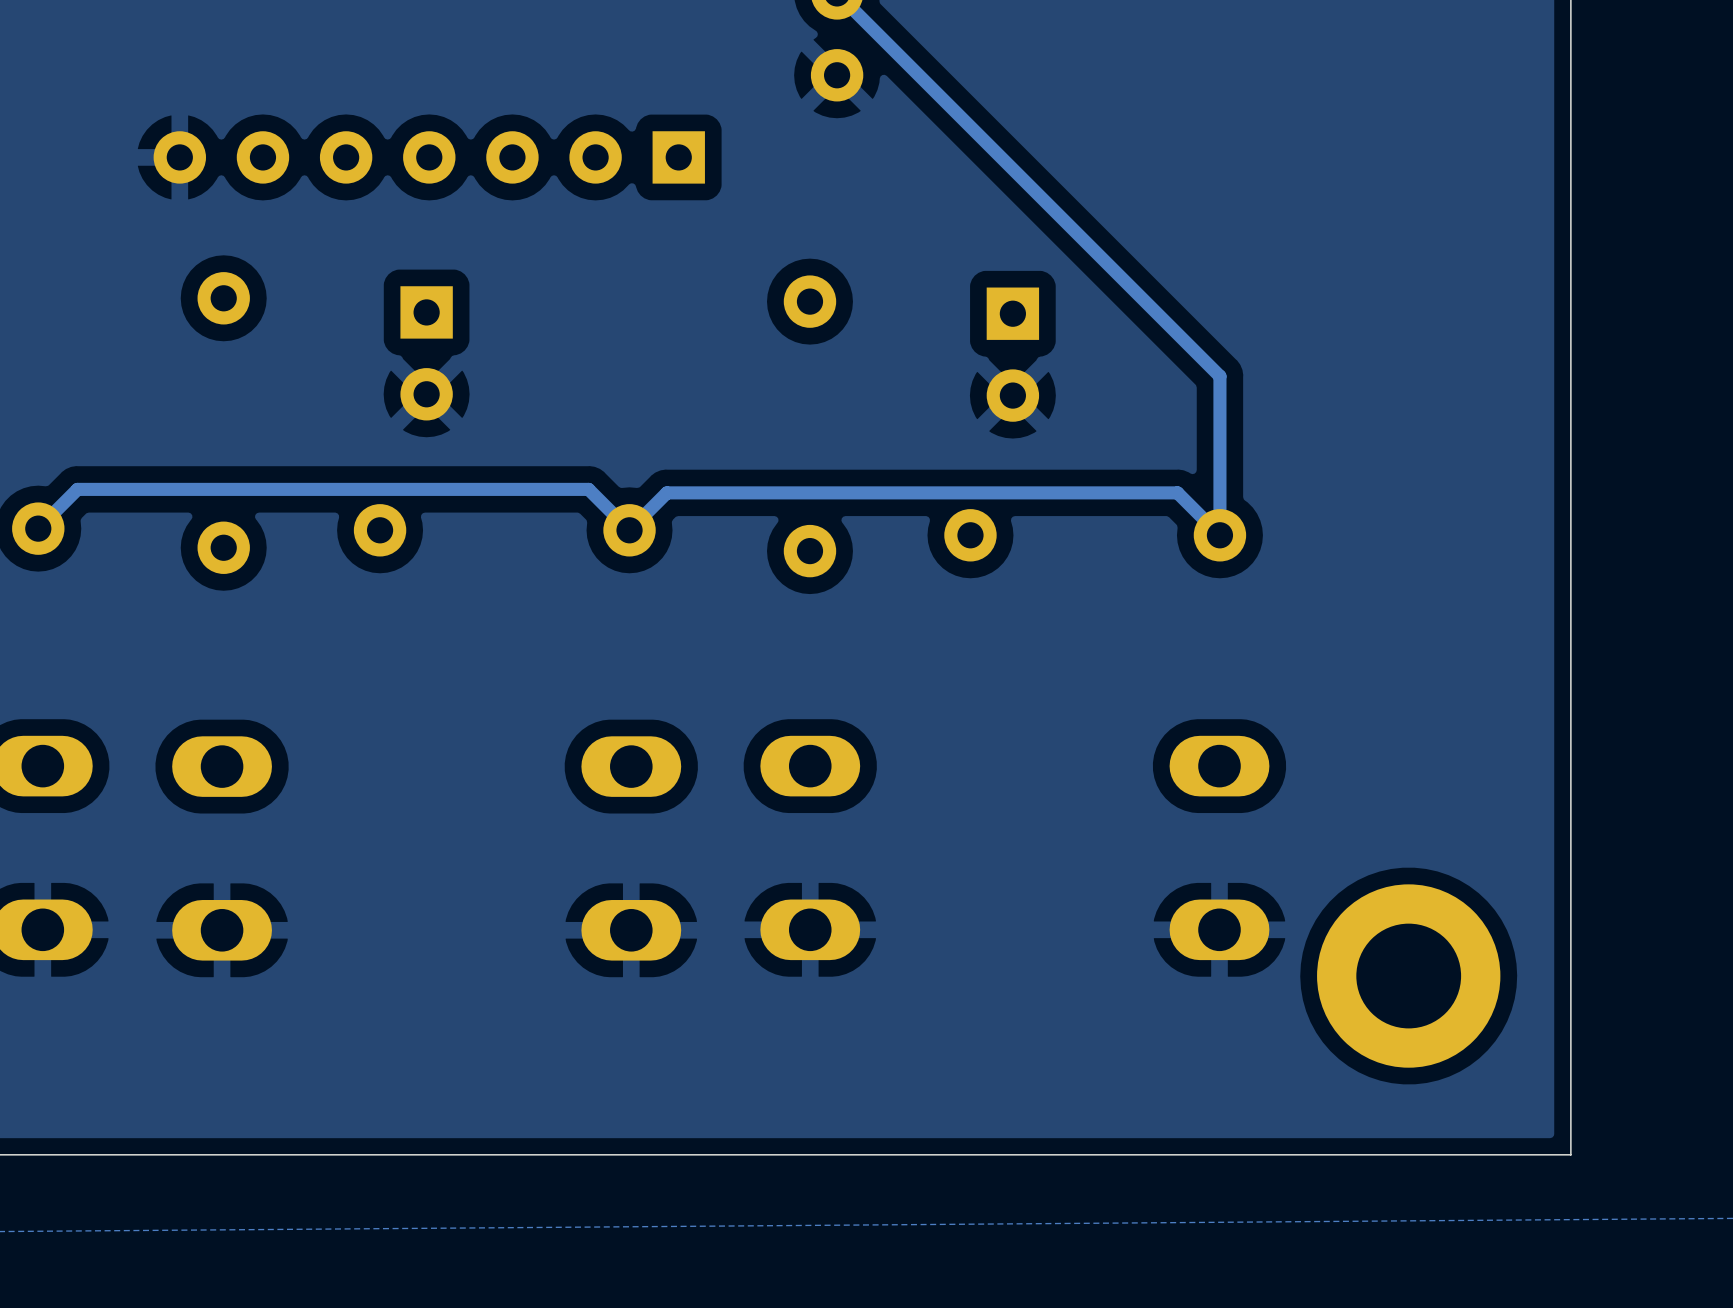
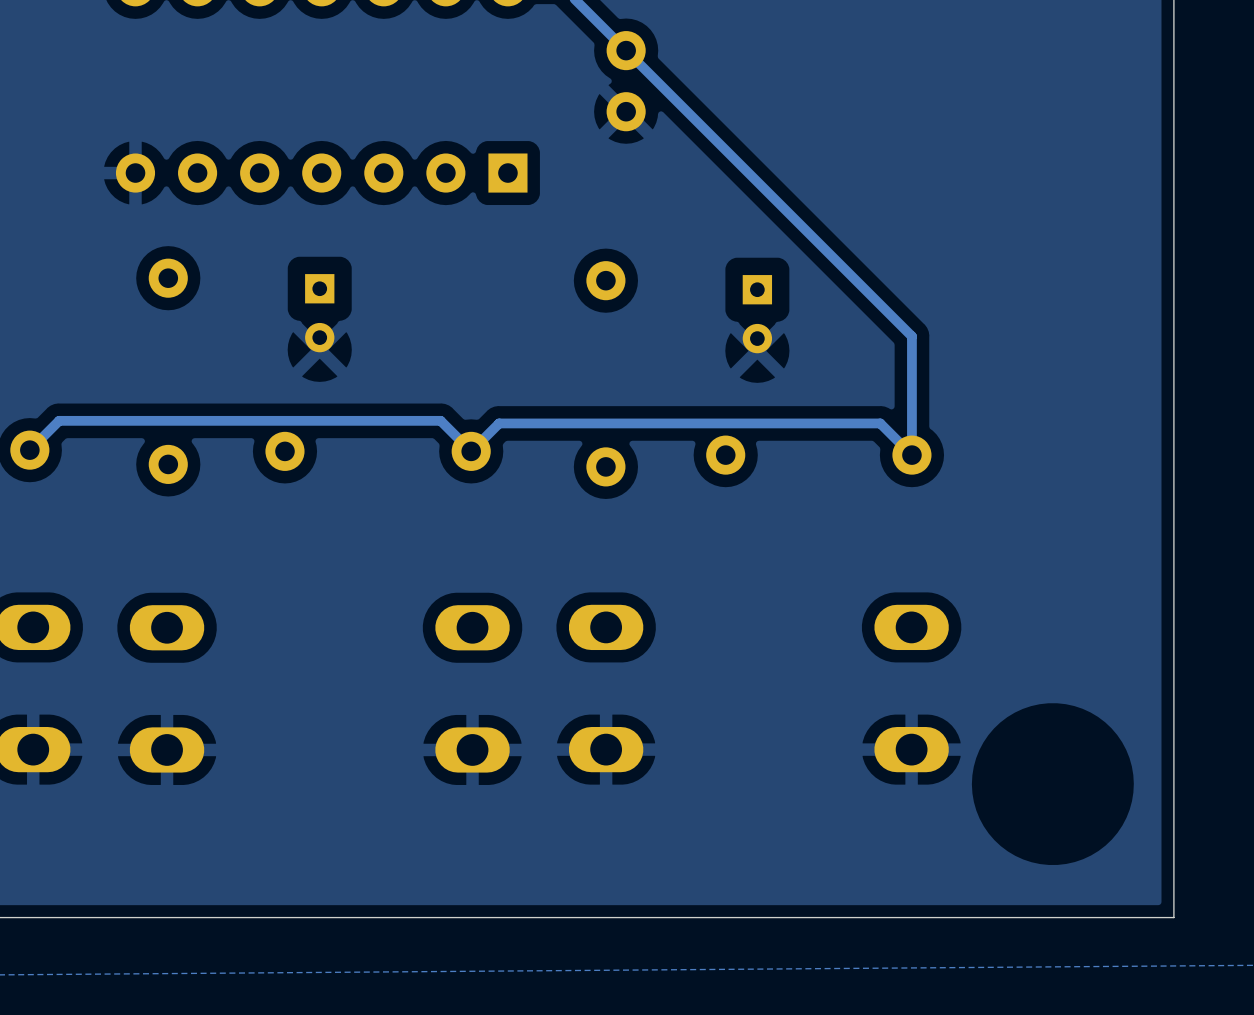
part footprint: [400, 286, 453, 421] -> [305, 274, 335, 353]
part footprint: [986, 287, 1040, 422] -> [742, 275, 773, 354]
part: (1408, 976) -> none

